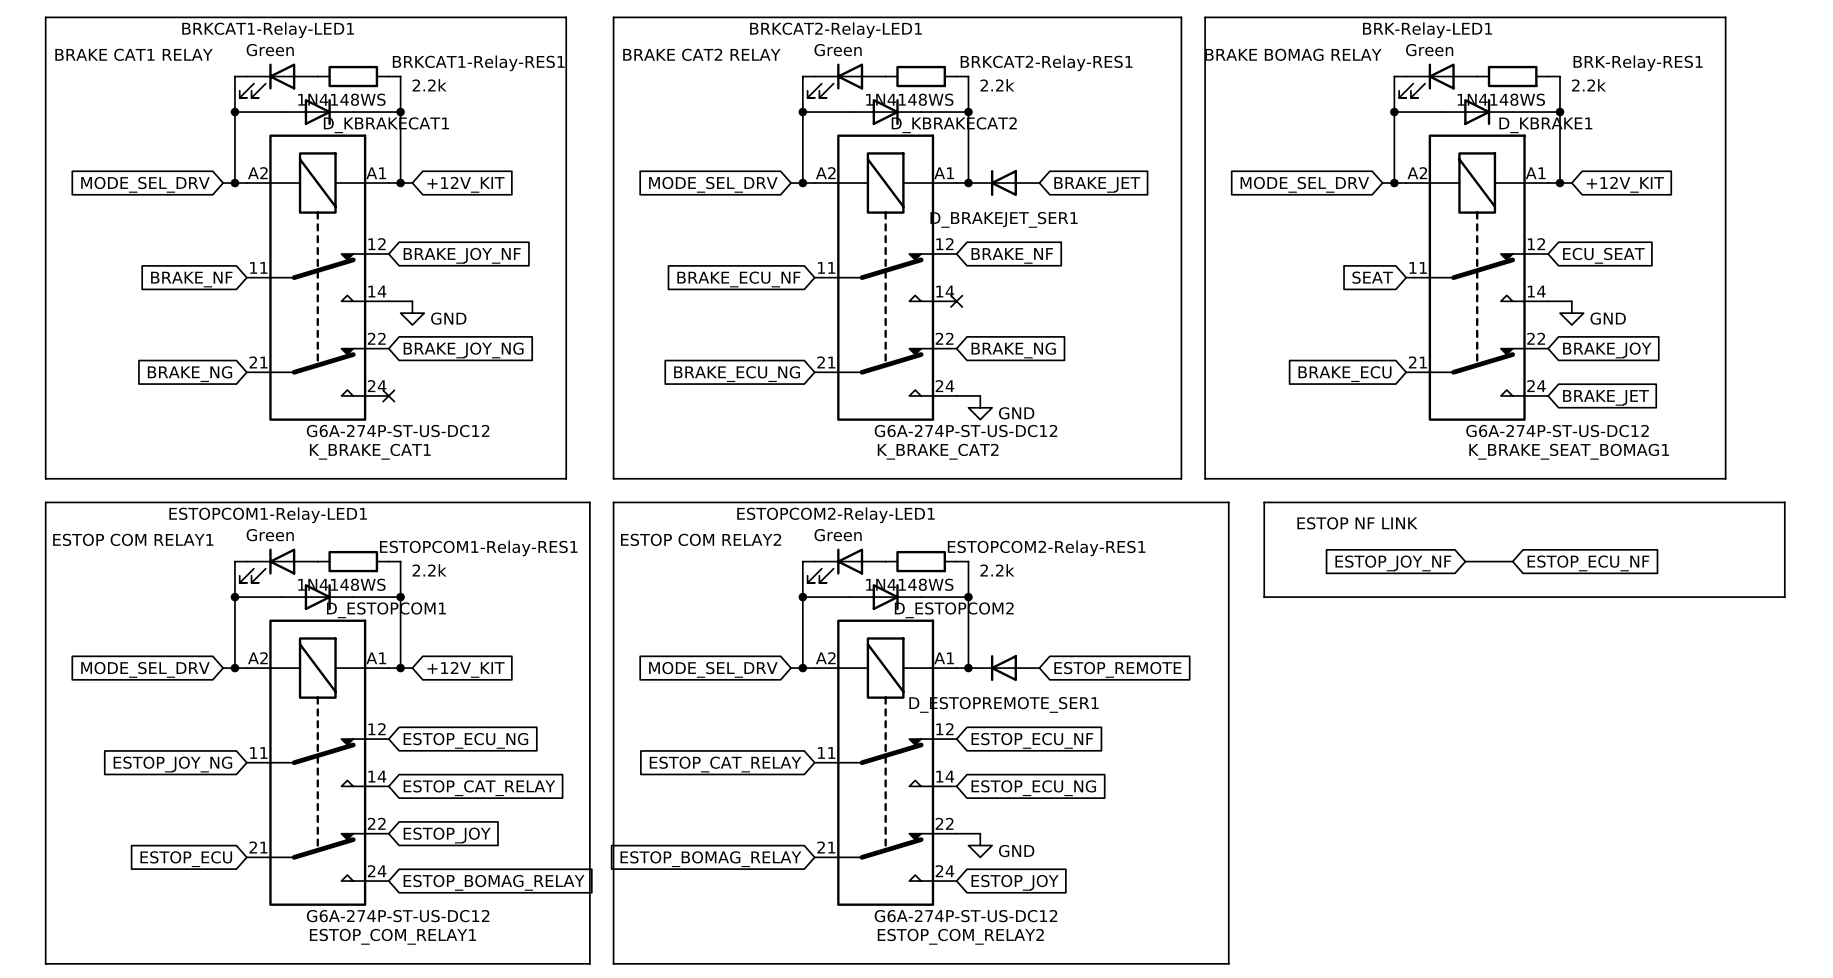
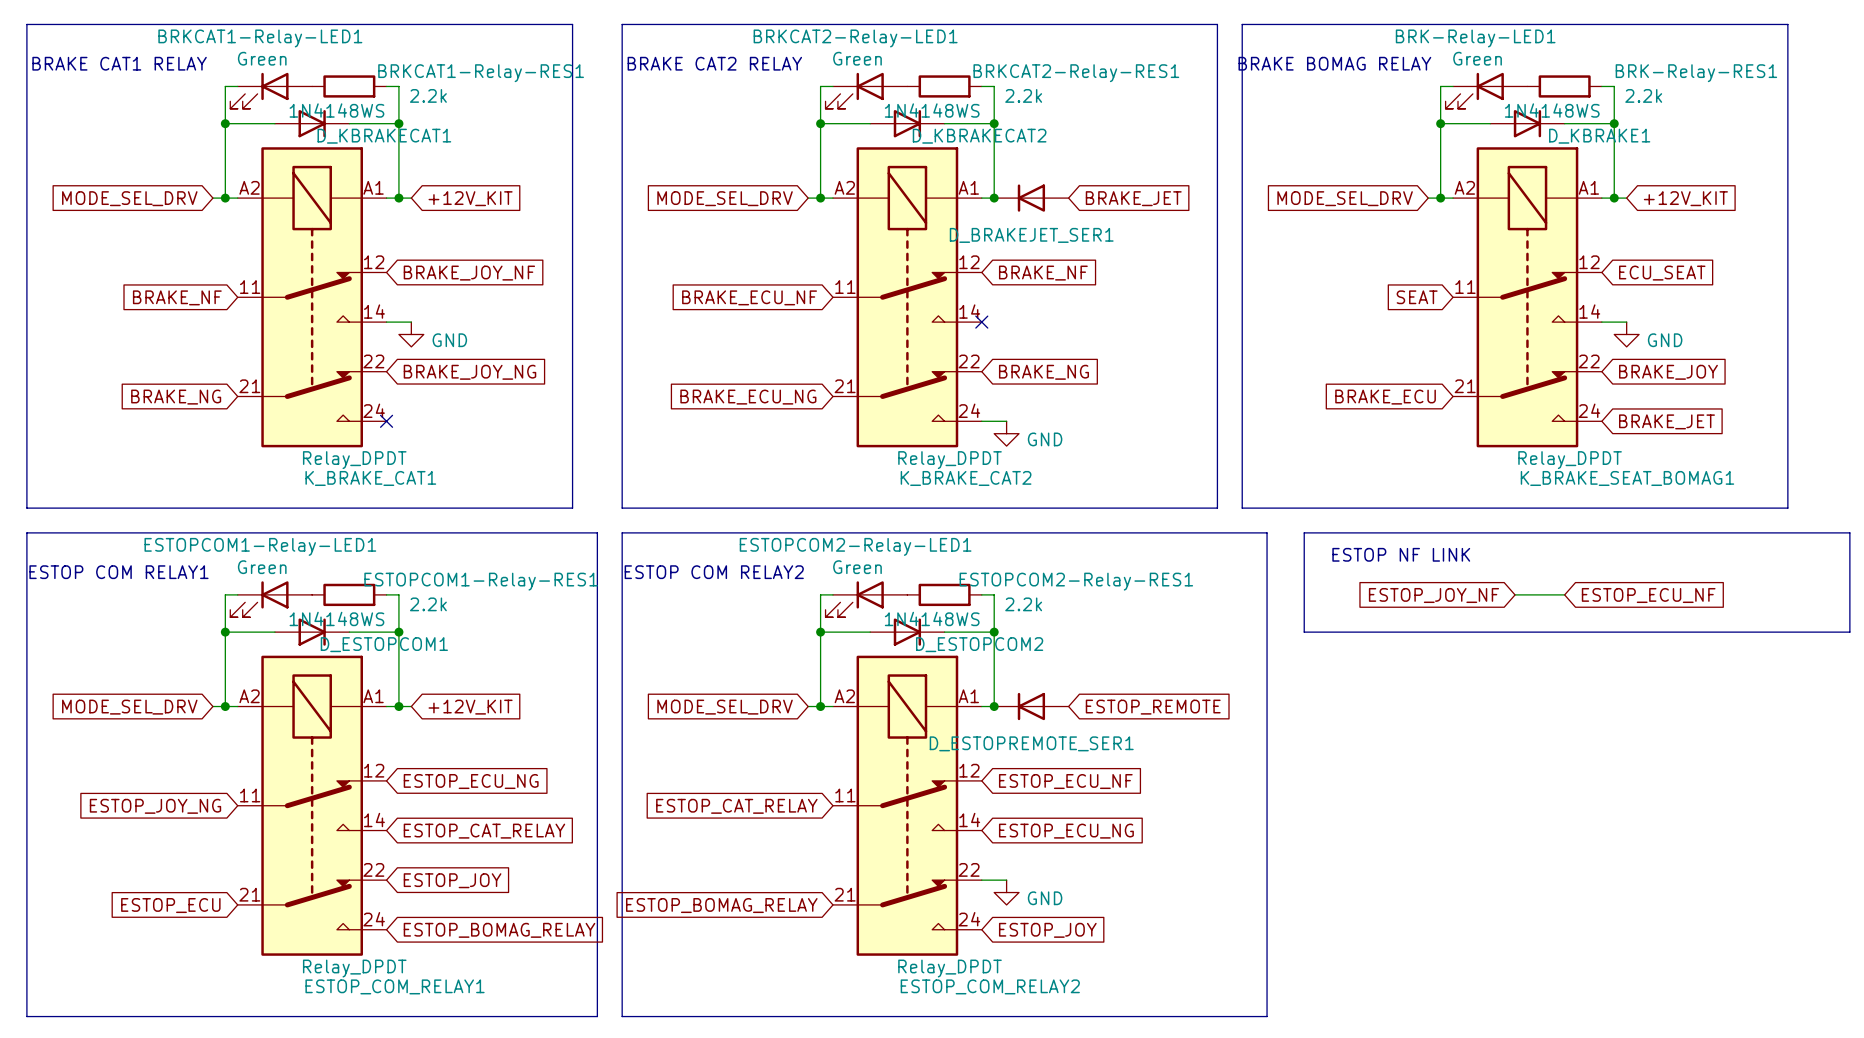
K_BRAKE_CAT1 value: G6A-274P-ST-US-DC12 (398, 431) -> Relay_DPDT (354, 460)
K_BRAKE_CAT2 value: G6A-274P-ST-US-DC12 (965, 431) -> Relay_DPDT (950, 460)
K_BRAKE_SEAT_BOMAG1 value: G6A-274P-ST-US-DC12 (1557, 431) -> Relay_DPDT (1570, 460)
ESTOP_COM_RELAY1 value: G6A-274P-ST-US-DC12 (398, 916) -> Relay_DPDT (354, 968)
ESTOP_COM_RELAY2 value: G6A-274P-ST-US-DC12 (965, 916) -> Relay_DPDT (950, 968)

